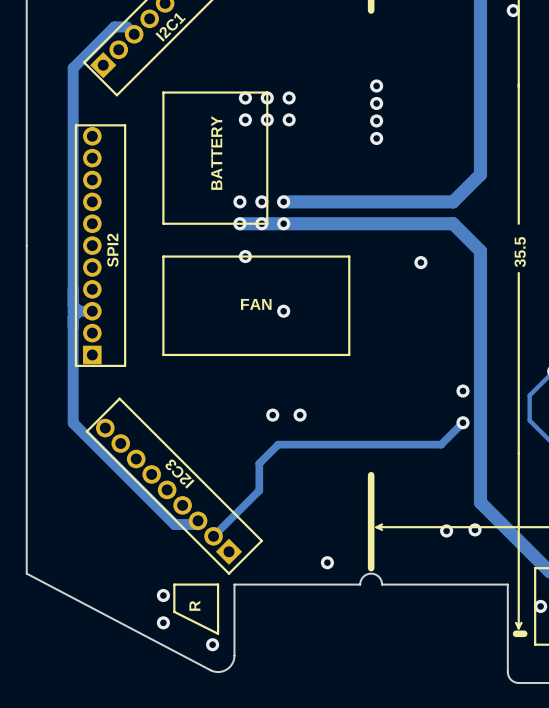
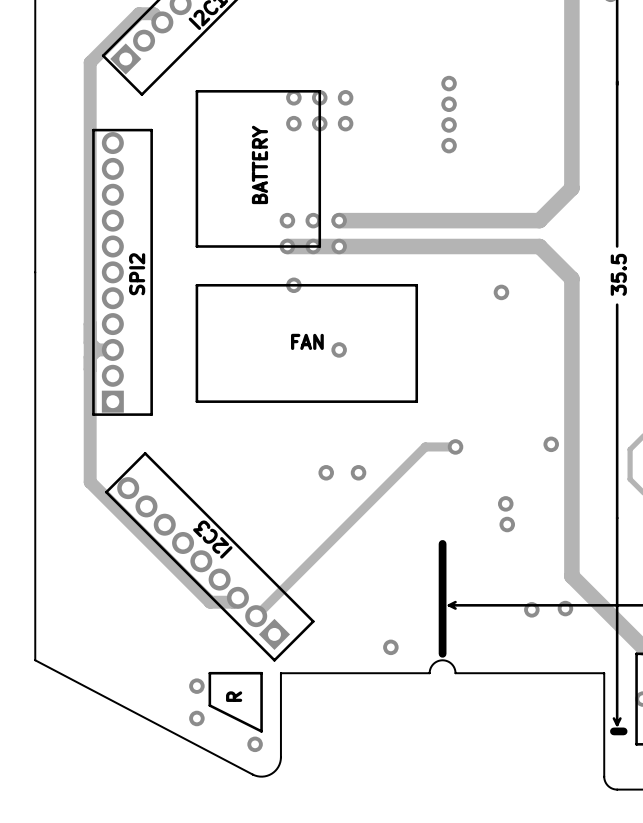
via: none -> (455, 446)
track: (462, 422) (441, 444) (278, 444) (259, 463) (259, 490) -> (455, 446) (425, 446) (310, 562)
via: (462, 422) -> none
via: none -> (505, 503)
via: none -> (507, 524)

